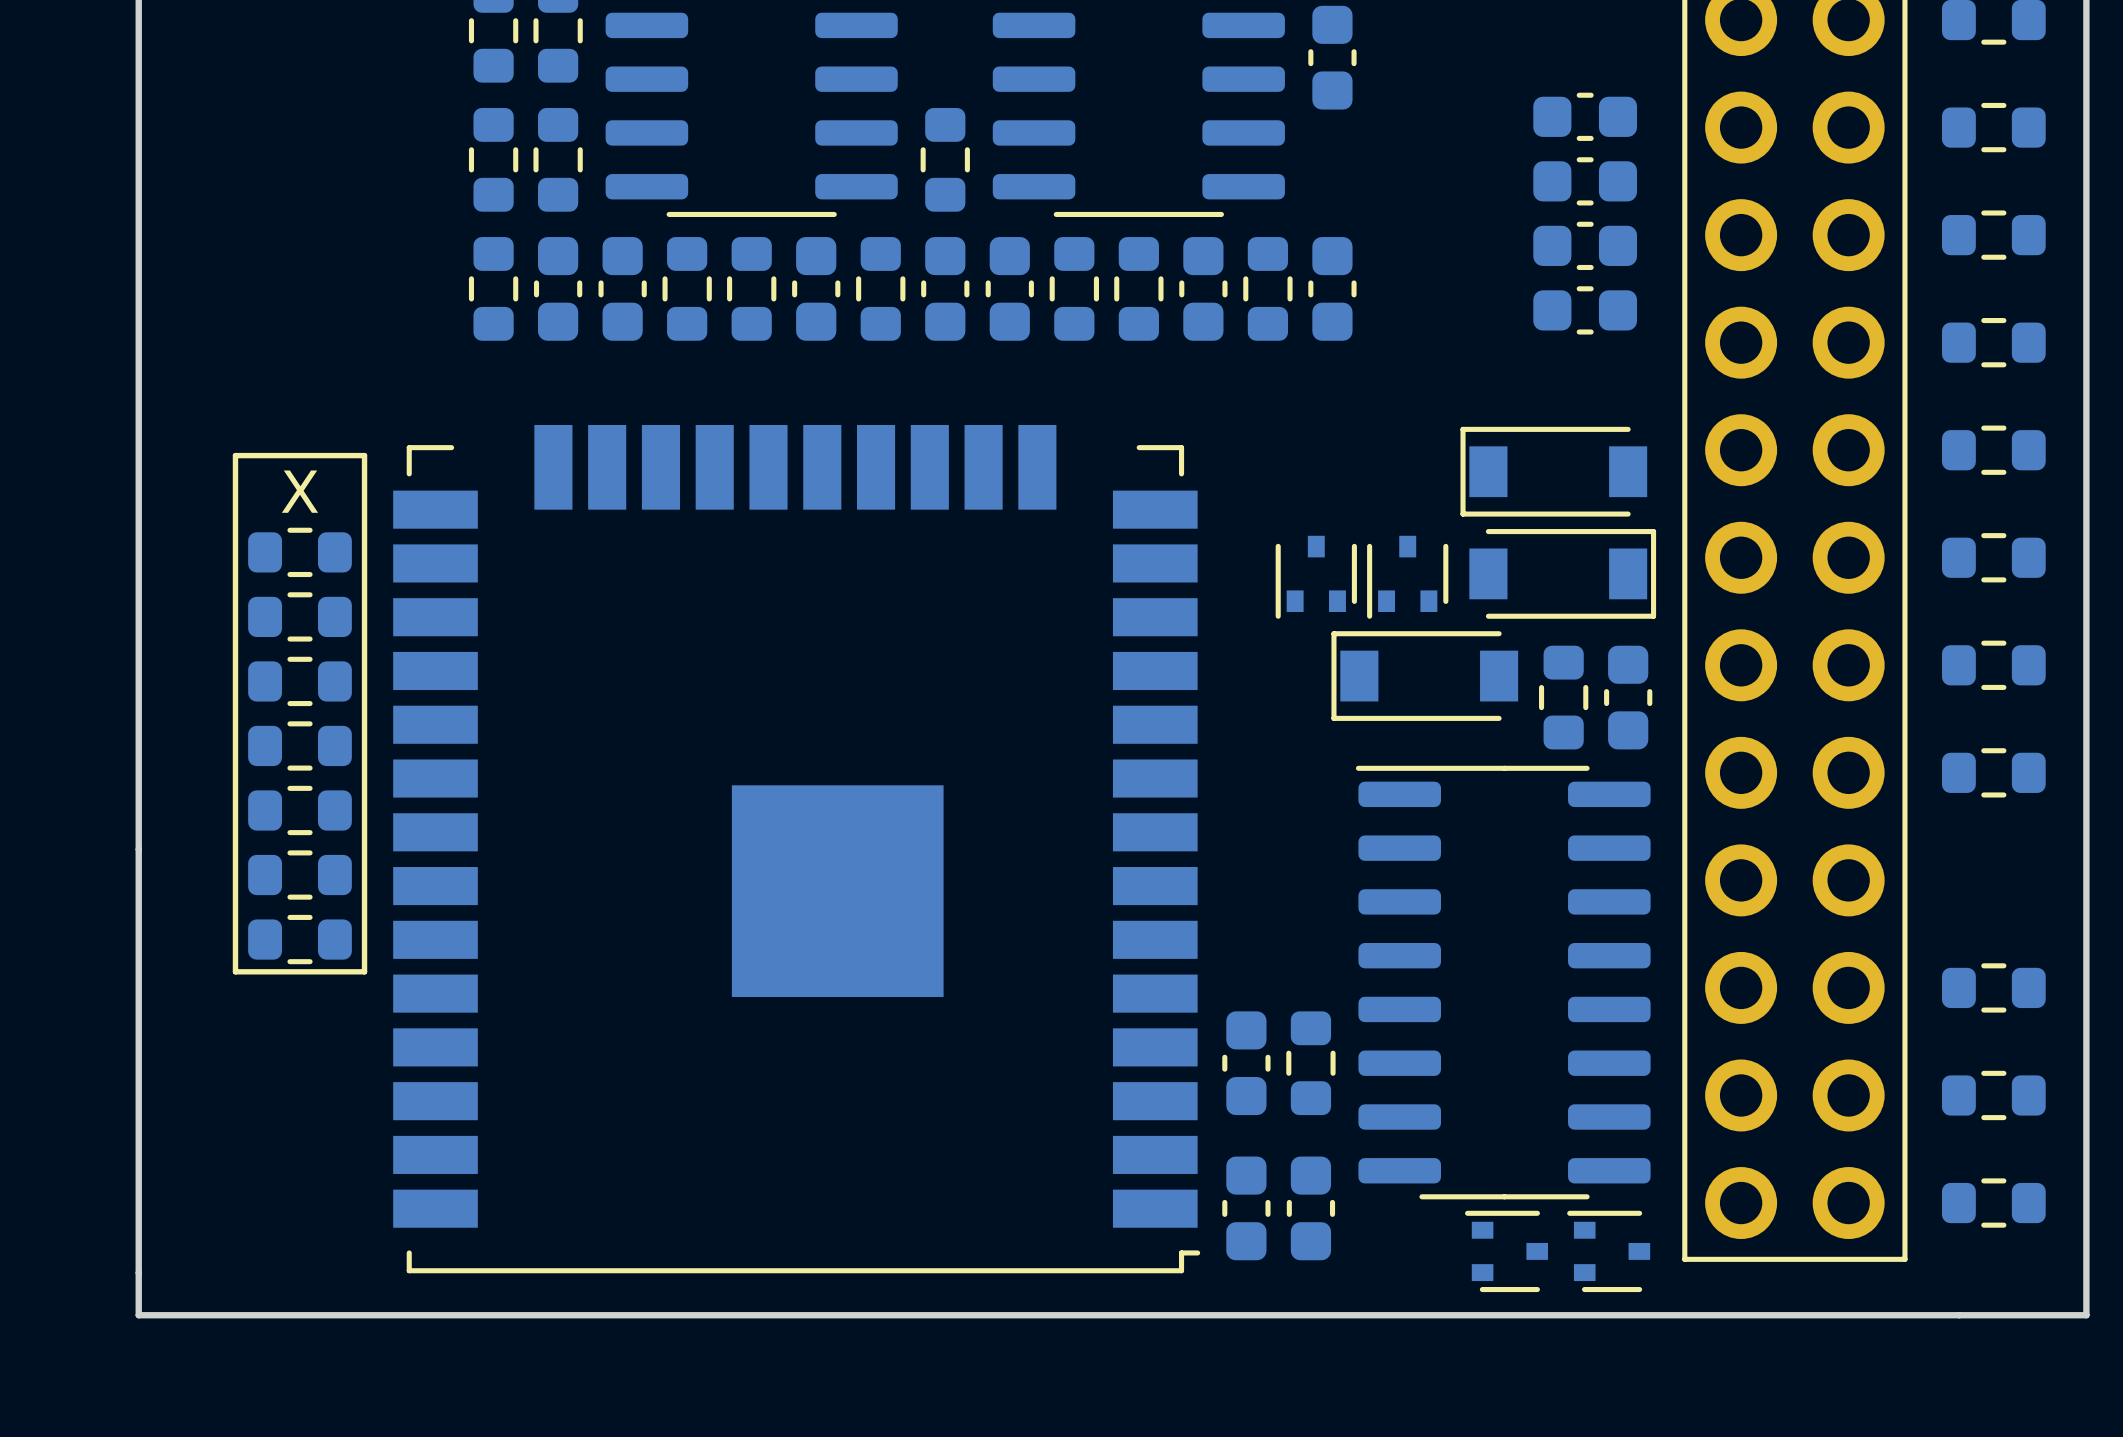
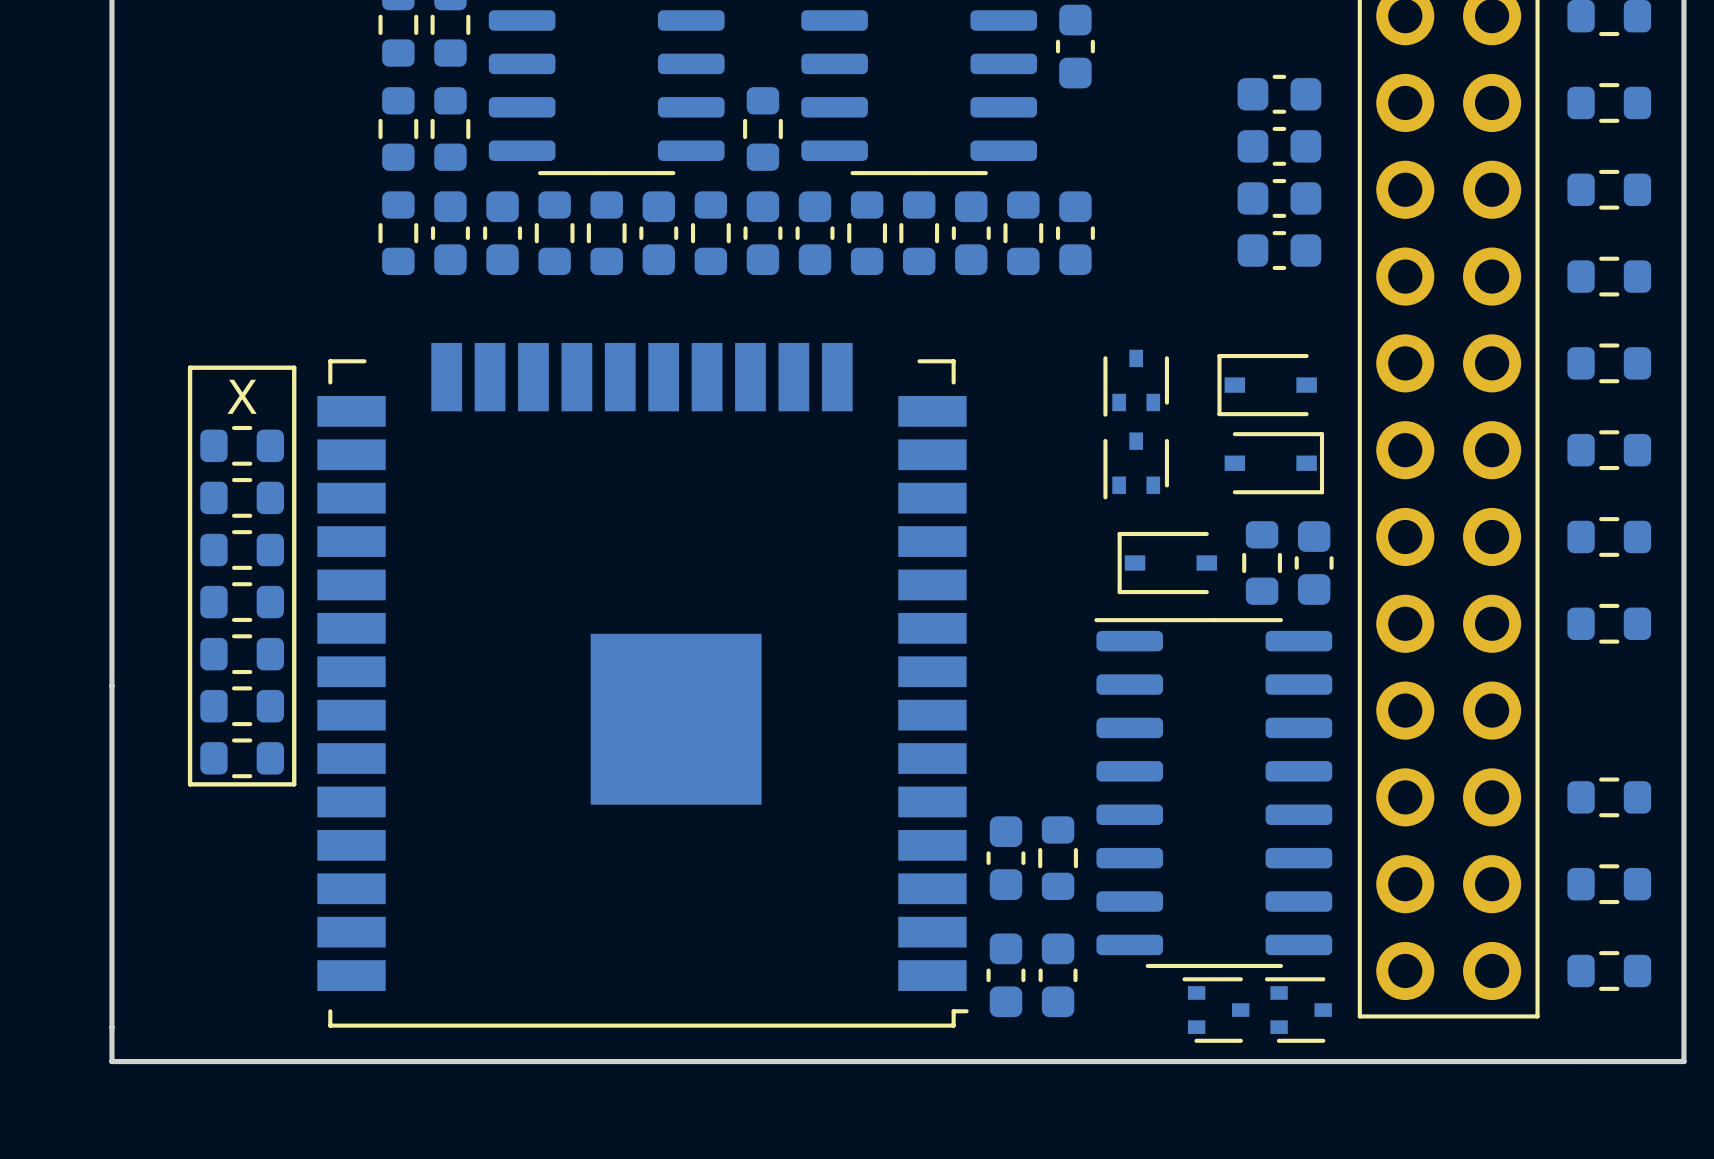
part footprint: [1460, 426, 1648, 517] -> [1217, 353, 1317, 417]
part footprint: [1469, 529, 1657, 619] -> [1224, 432, 1325, 495]
part position: (1316, 577) -> (1136, 383)
part footprint: [1331, 631, 1519, 721] -> [1117, 531, 1218, 595]

